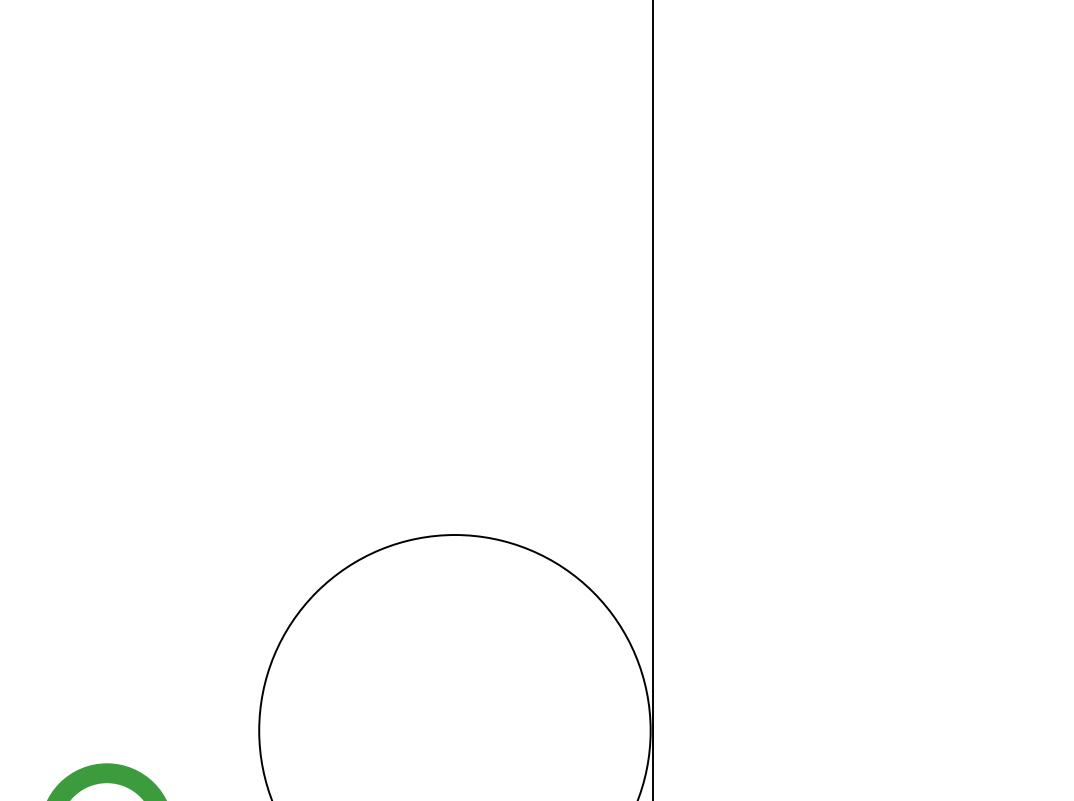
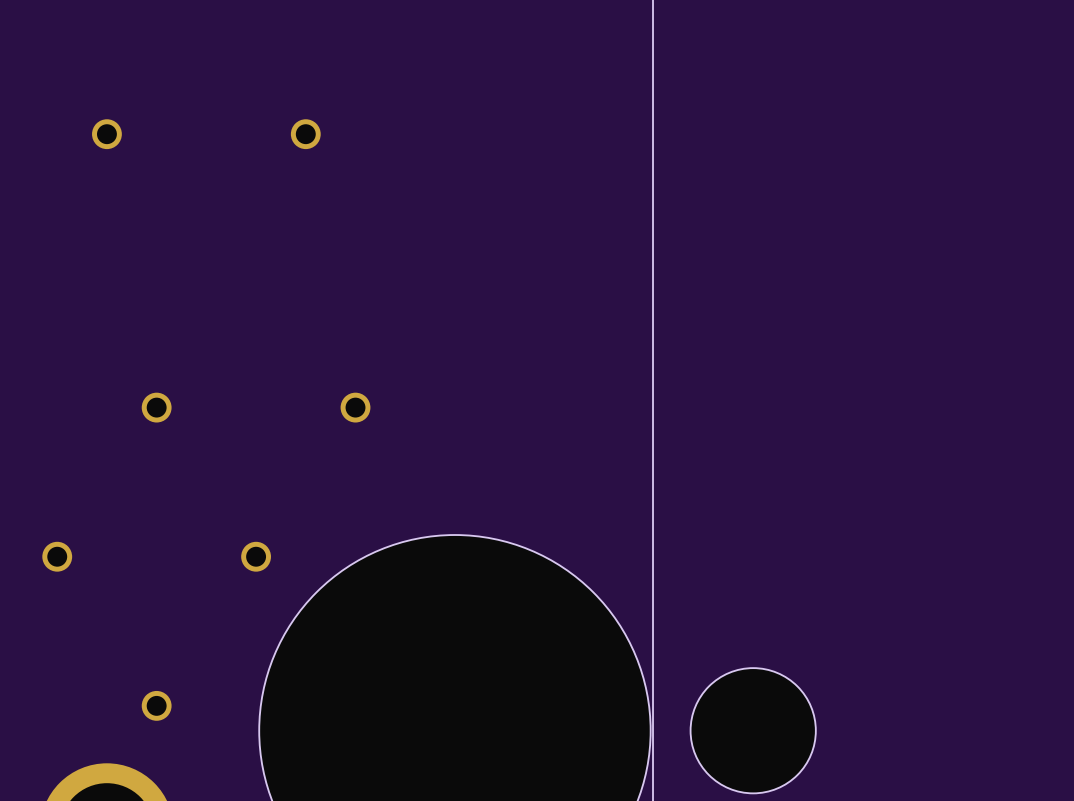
via: none -> (106, 134)
via: none -> (305, 134)
via: none -> (156, 407)
via: none -> (355, 407)
via: none -> (57, 556)
via: none -> (256, 556)
via: none -> (156, 705)
hole: none -> (753, 730)

